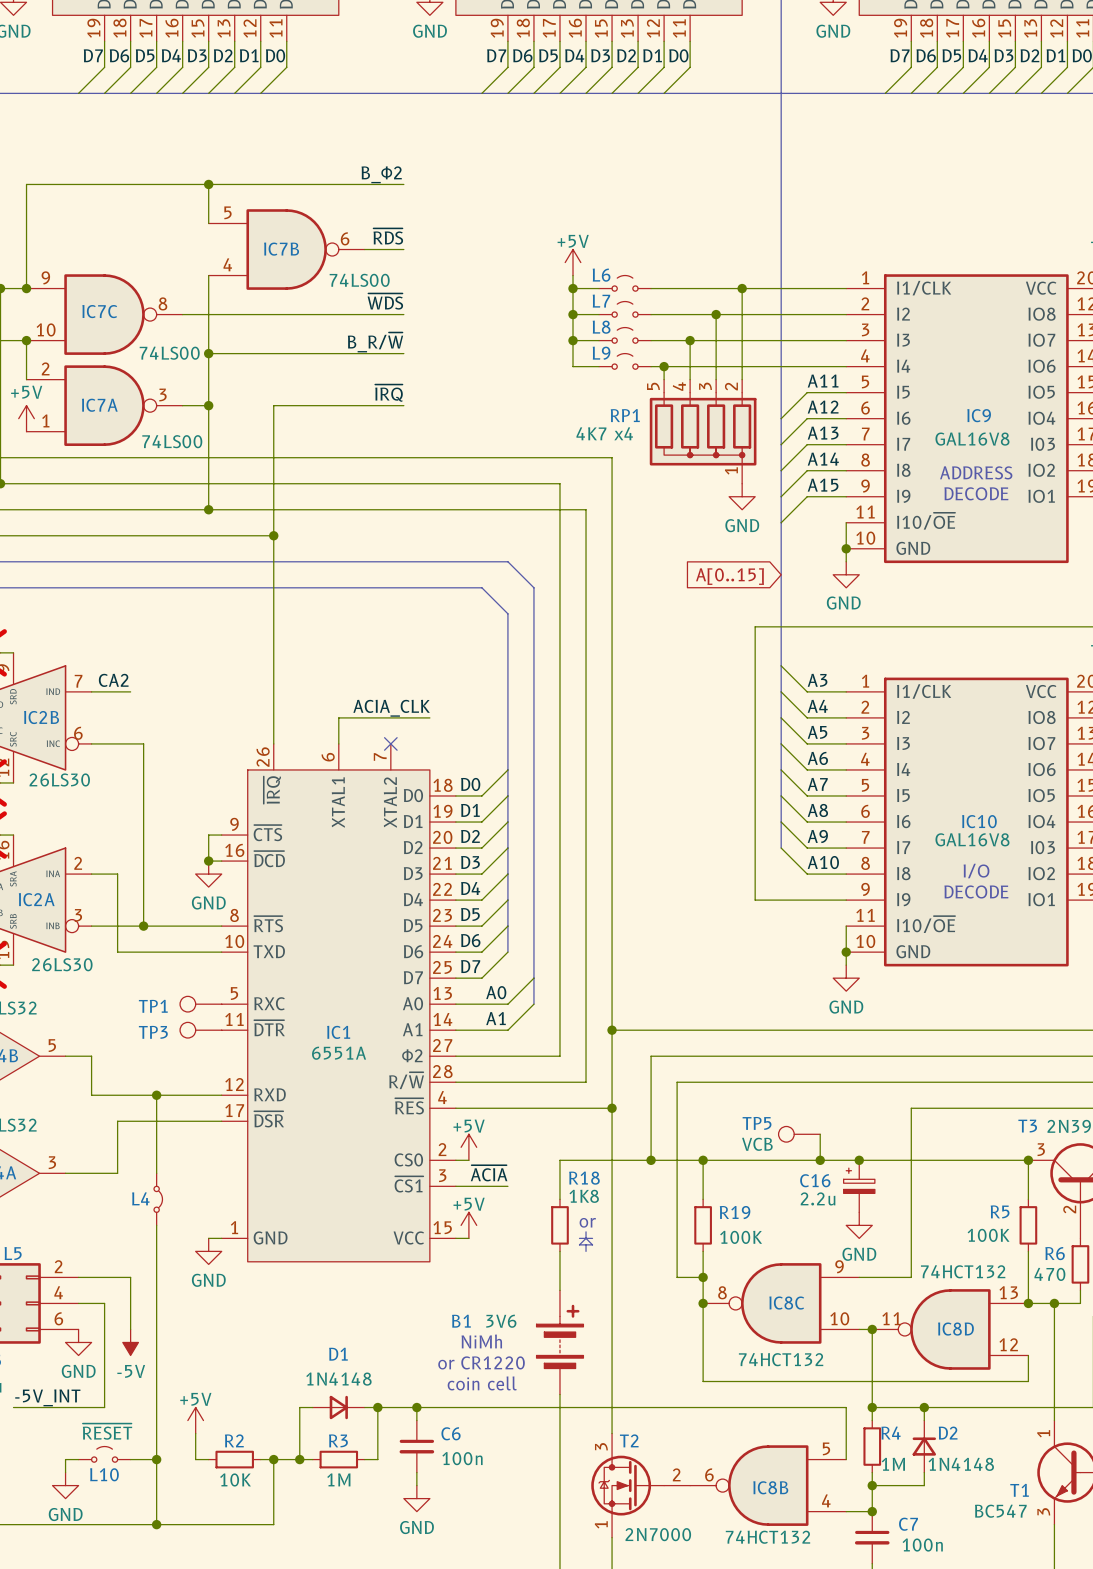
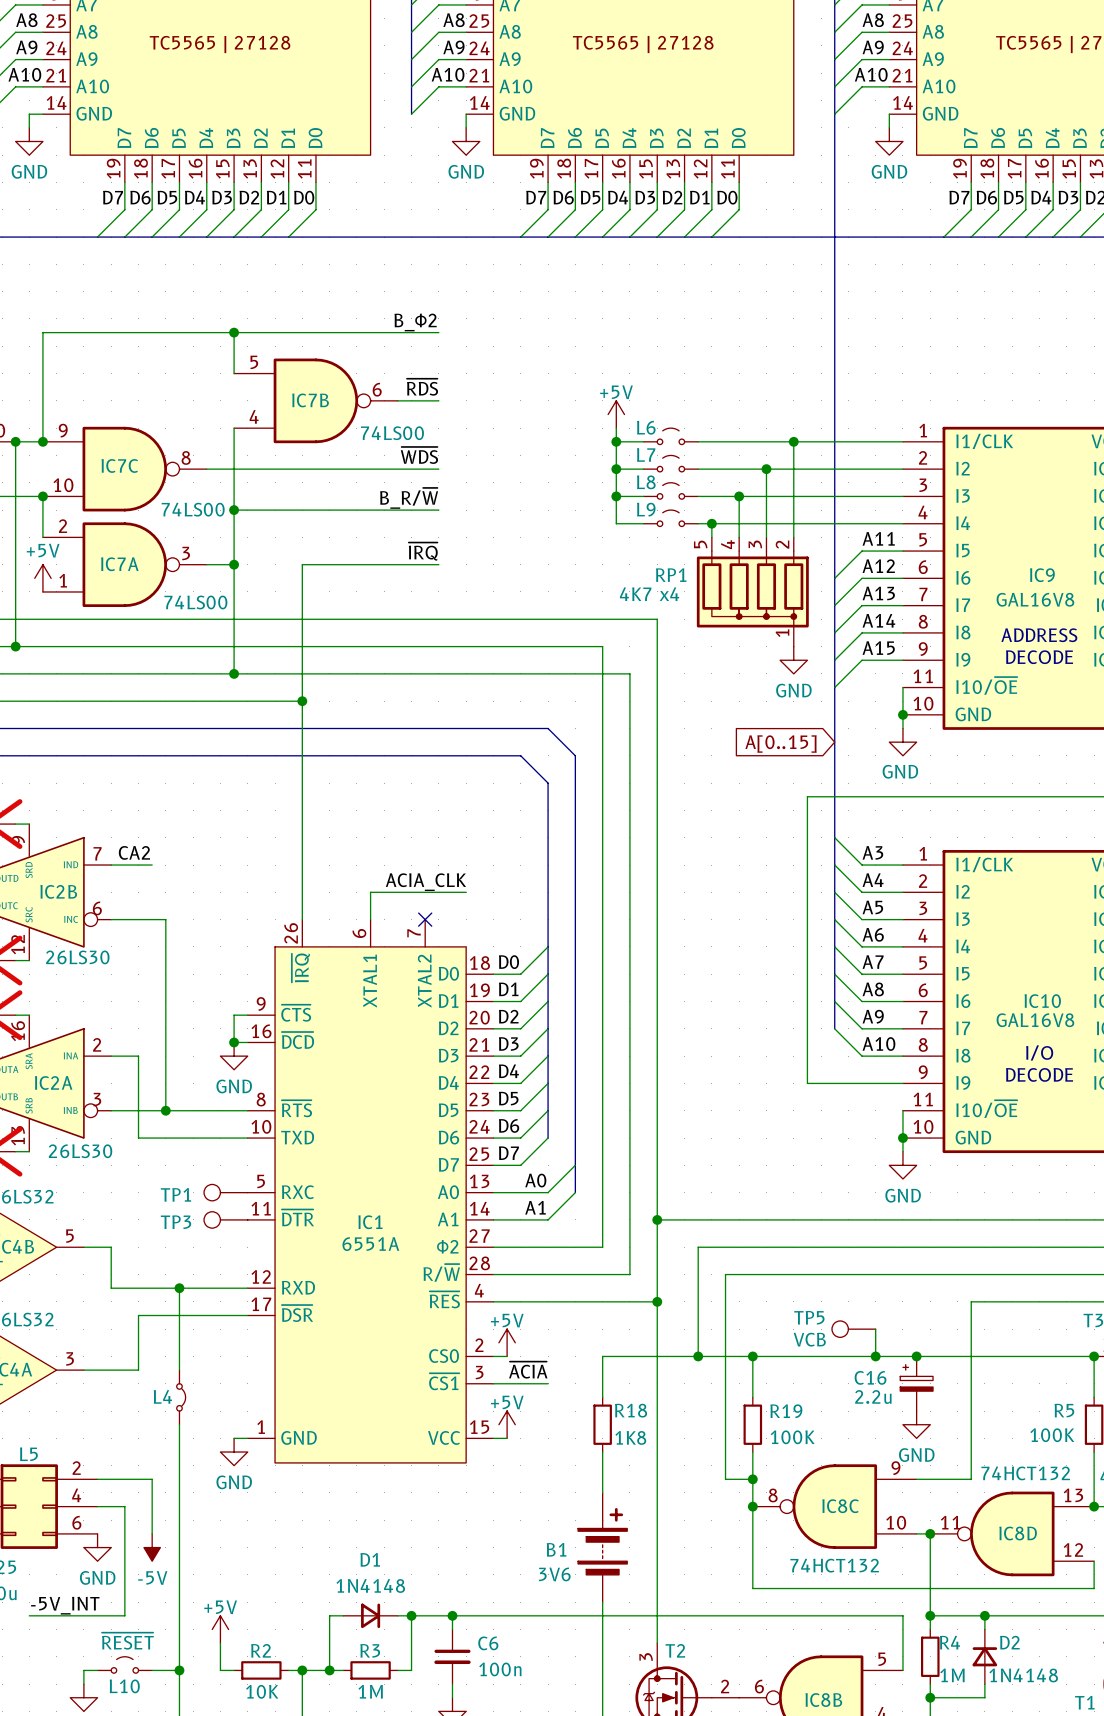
R18 name position: R18 (584, 1178) -> R18 (631, 1410)
R18 value position: 1K8 (584, 1196) -> 1K8 (630, 1437)
text: or (587, 1222) -> none
line: (586, 1231) (586, 1238) -> none
line: (579, 1238) (592, 1238) -> none
line: (586, 1238) (579, 1244) (592, 1244) (586, 1238) -> none
line: (586, 1244) (586, 1251) -> none
B1 name position: B1 (461, 1321) -> B1 (556, 1549)
B1 value position: 3V6 (501, 1321) -> 3V6 (554, 1574)
text: NiMh (481, 1341) -> none
text: or CR1220 (481, 1362) -> none
text: coin cell (482, 1383) -> none

